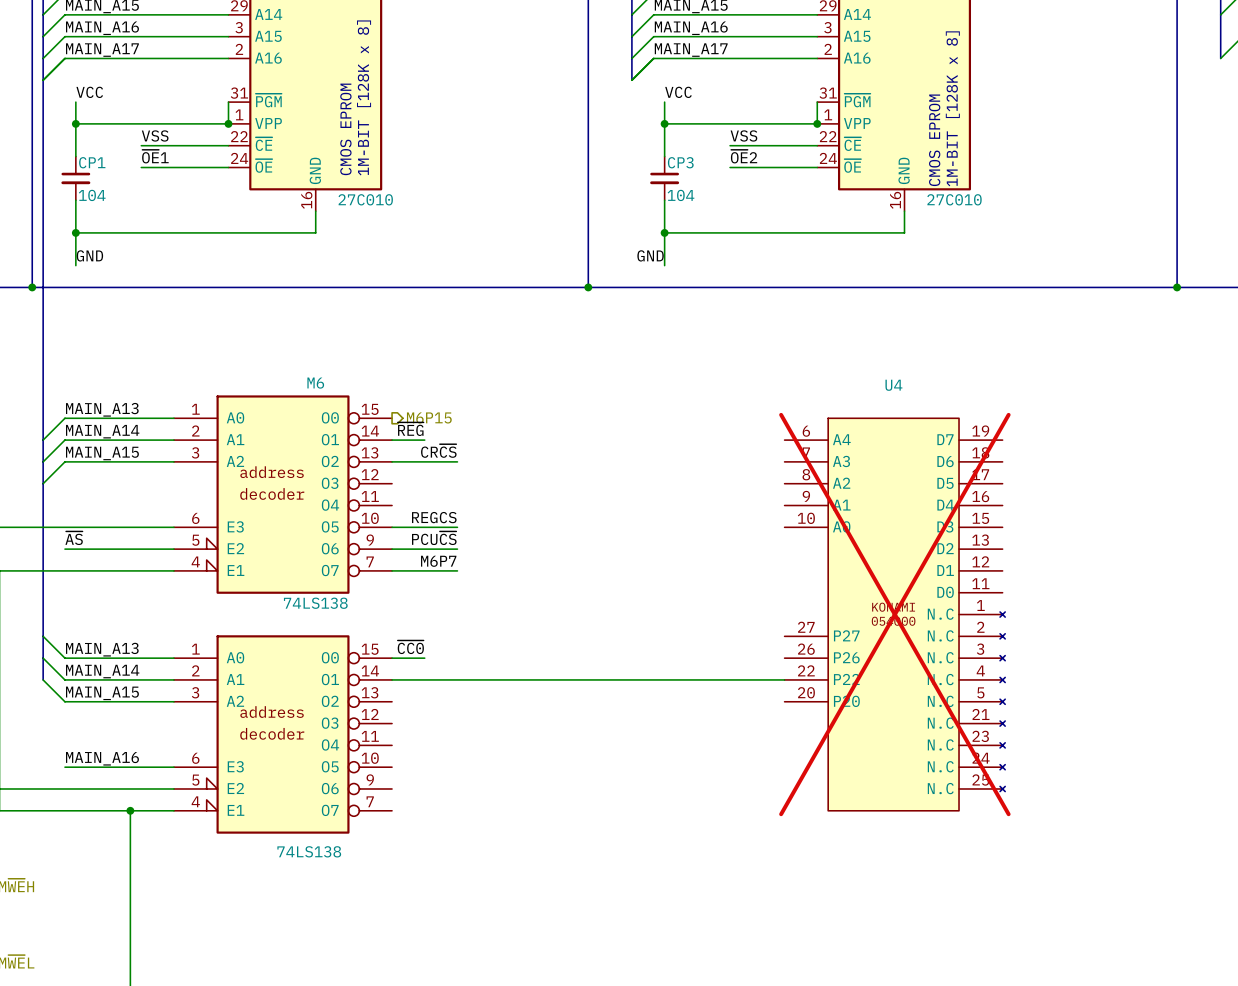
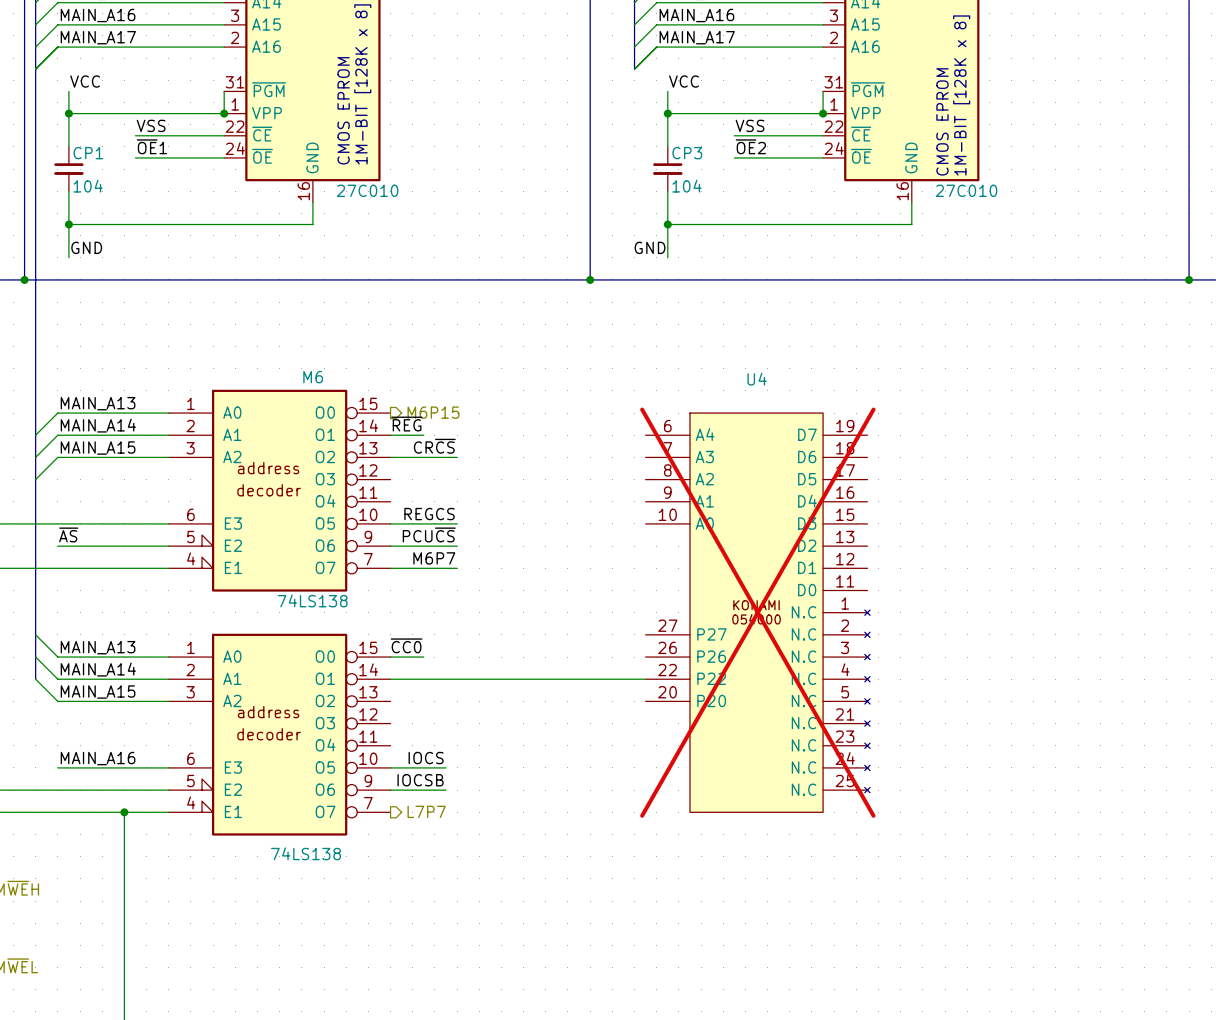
U4 position: (894, 614) -> (757, 612)
label: none -> IOCS (426, 758)
wire: none -> (390, 767) (445, 767)
label: none -> IOCSB (420, 780)
wire: none -> (390, 790) (445, 790)
hierarchical label: none -> L7P7 (426, 811)

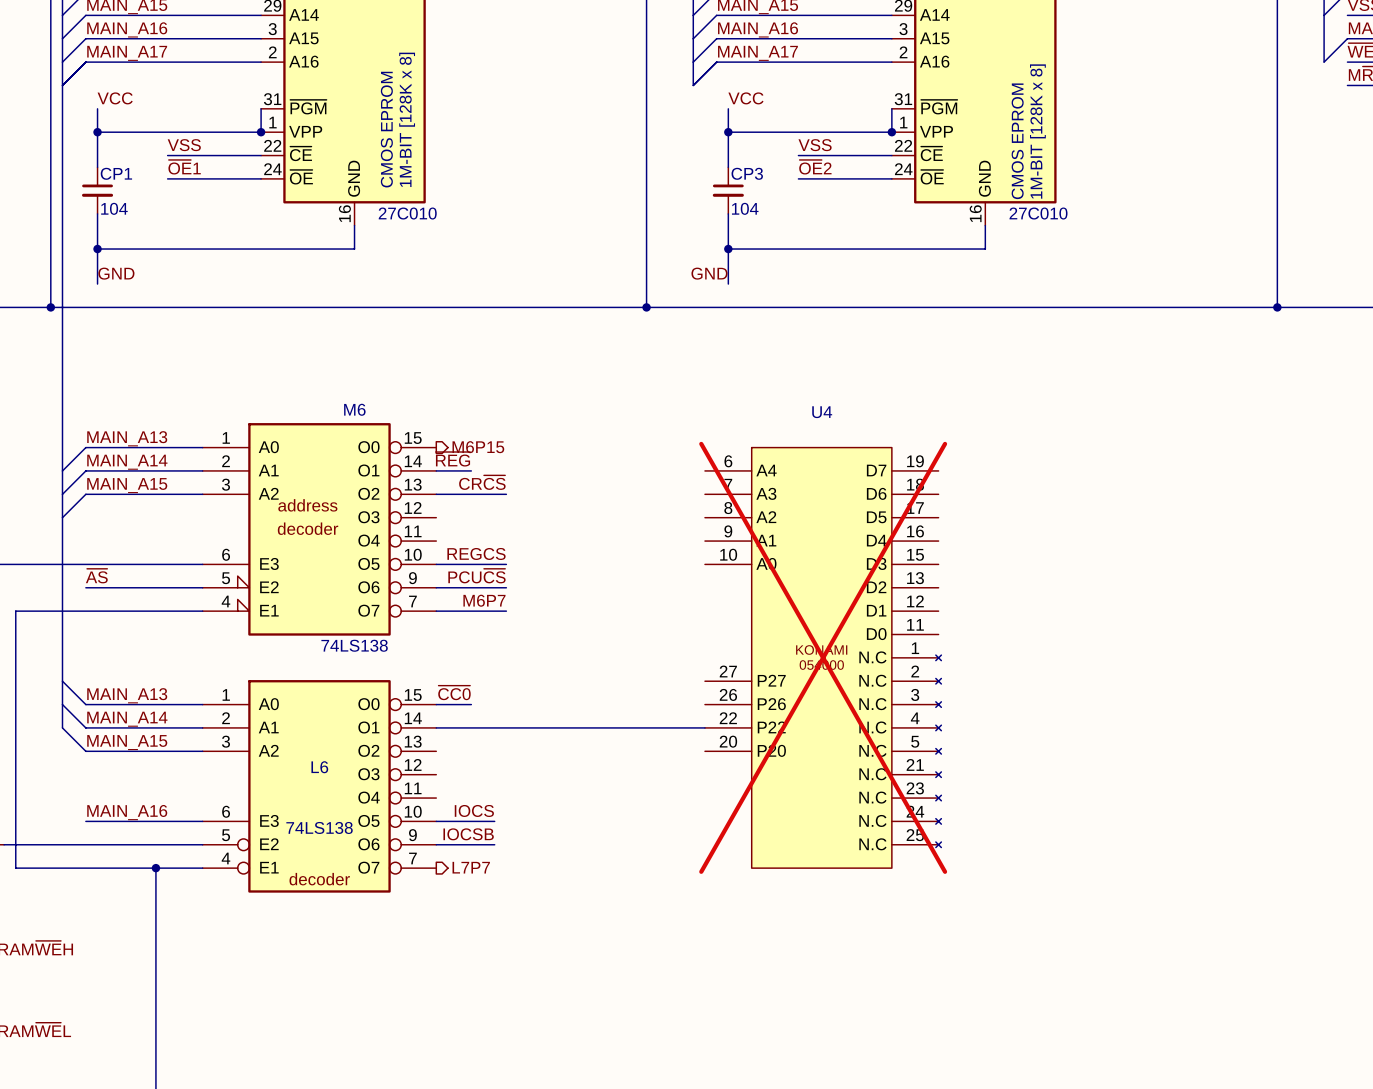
part: 74LS138 (279, 734) -> none
L6: none -> 74LS138 (319, 786)

